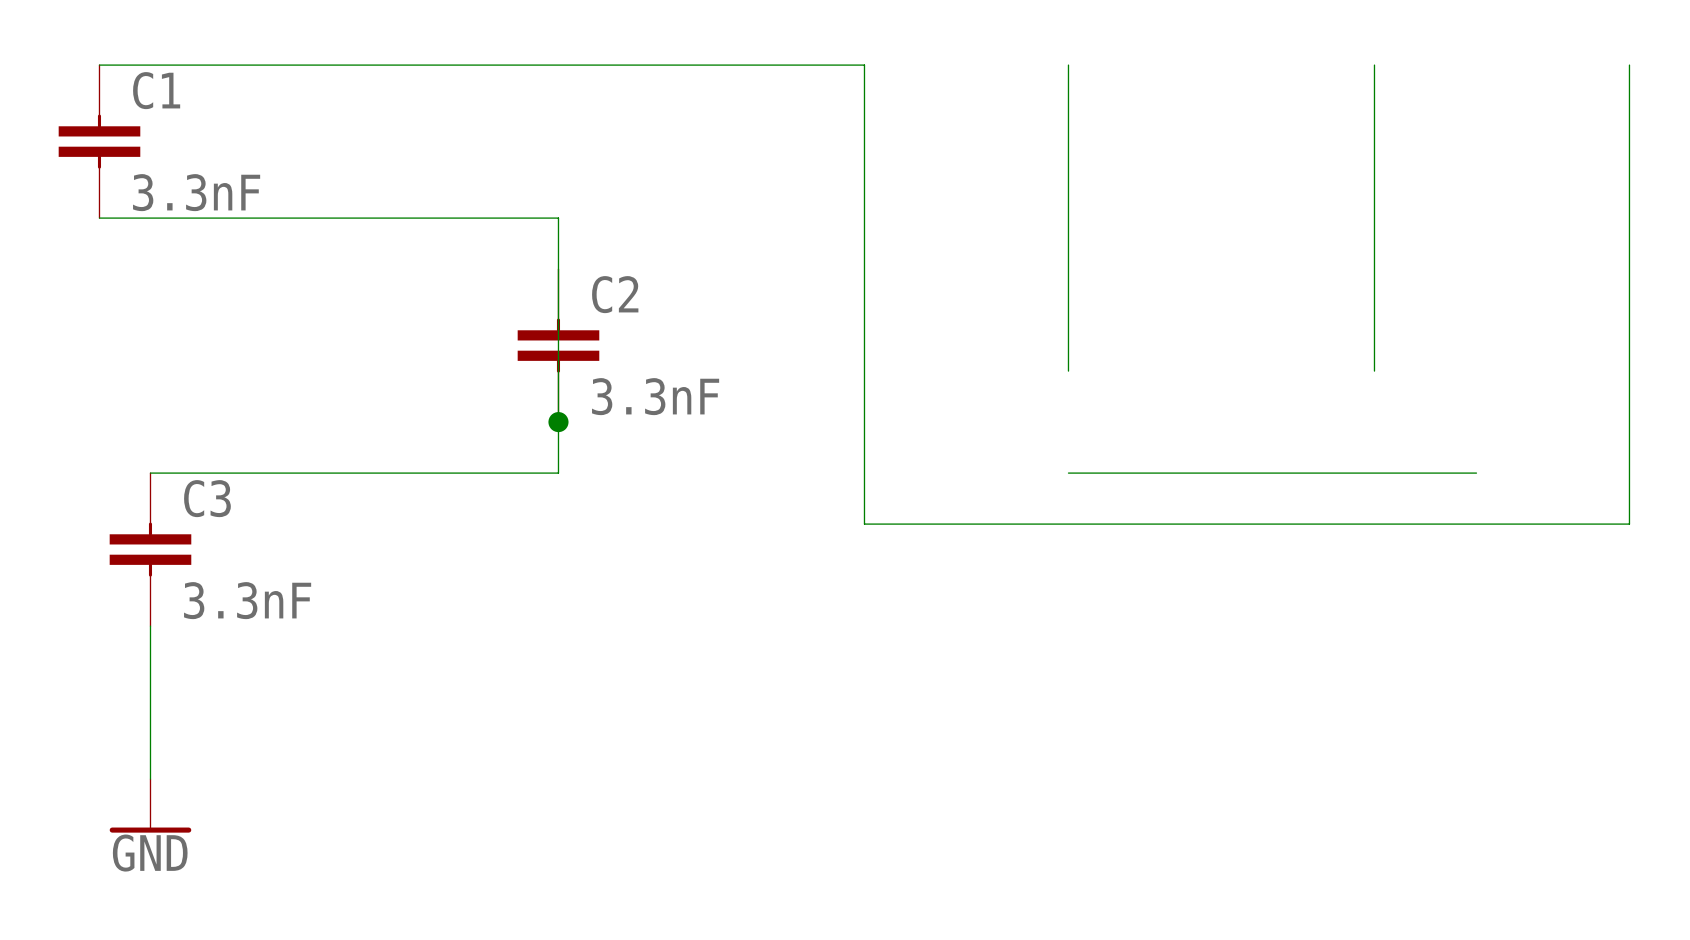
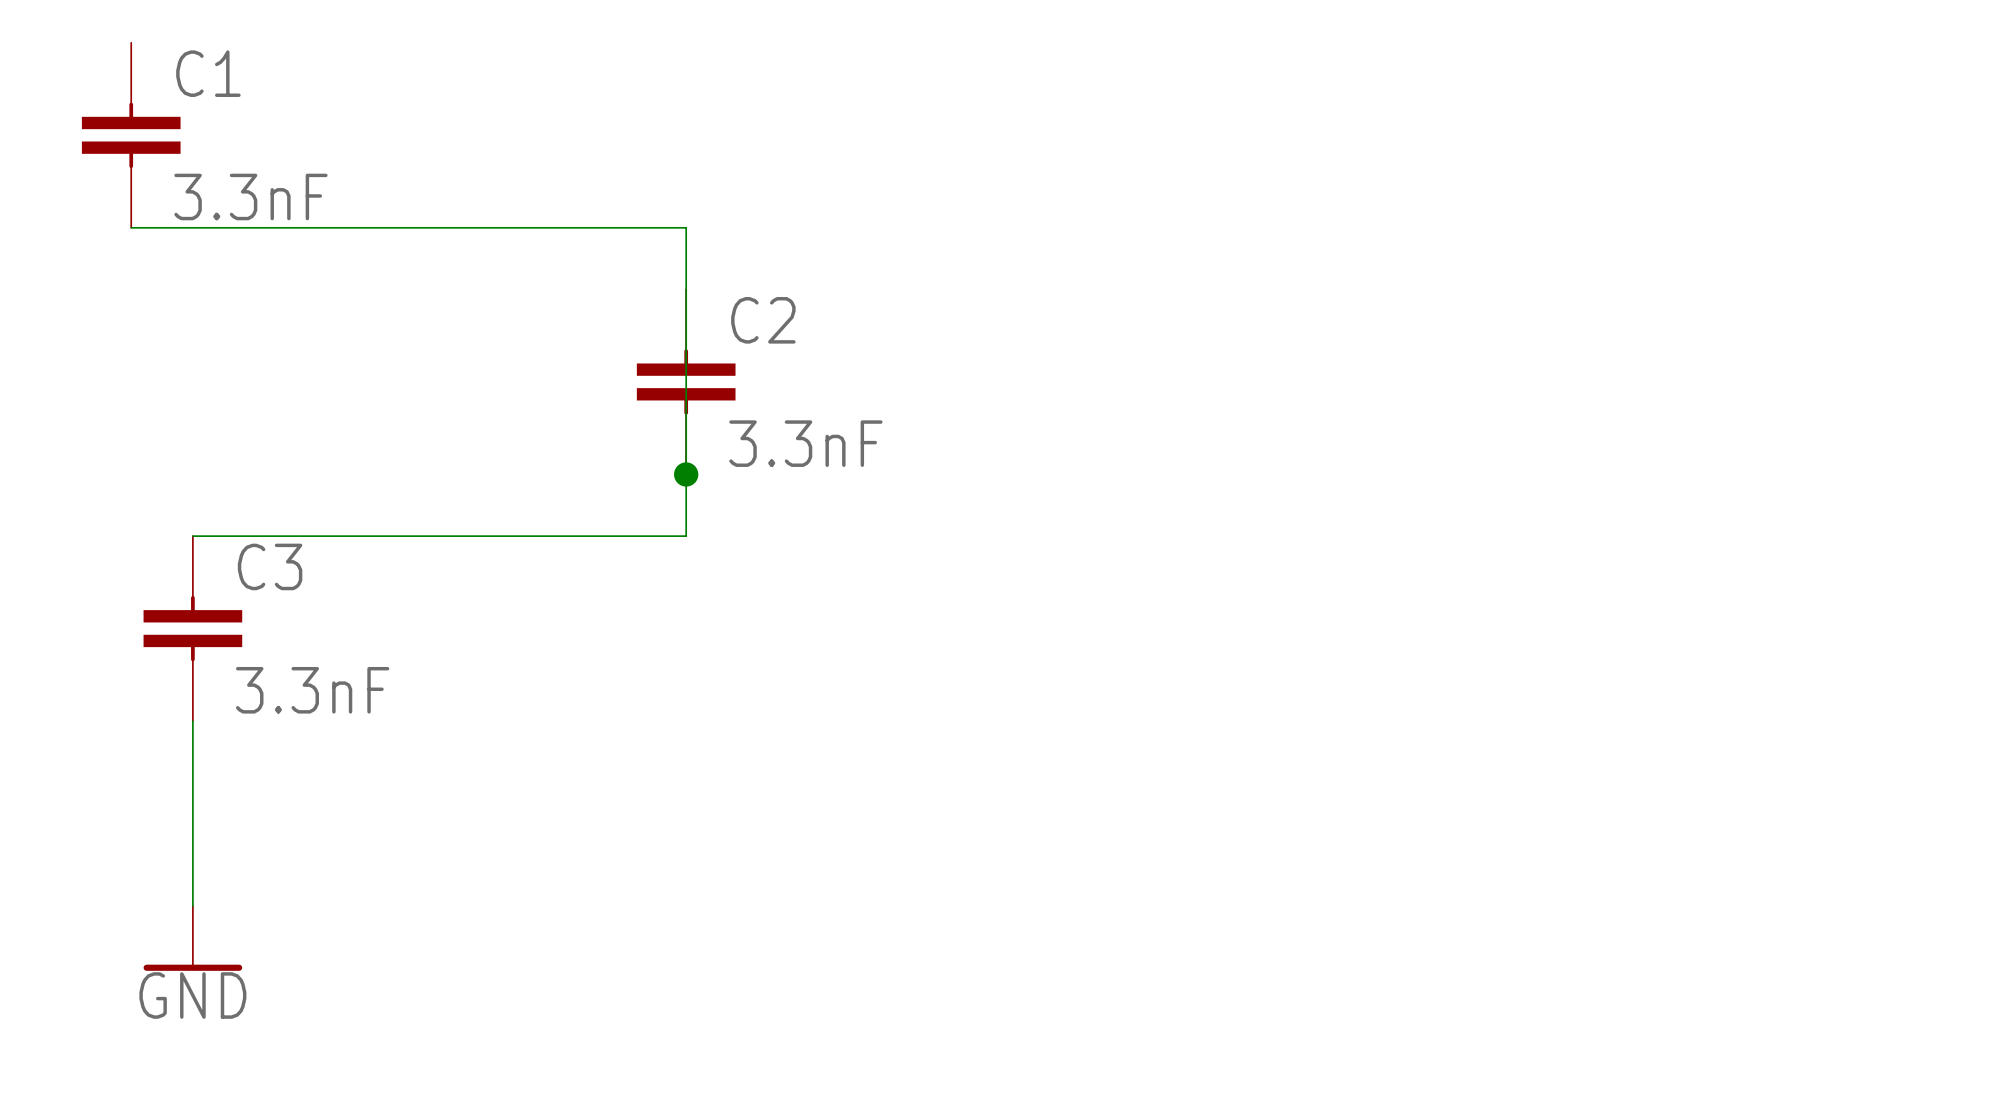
wire: (99, 65) (864, 65) (864, 524) (1629, 524) (1629, 65) -> none
wire: (1068, 65) (1068, 371) -> none
wire: (1374, 65) (1374, 371) -> none
wire: (1068, 473) (1476, 473) -> none

